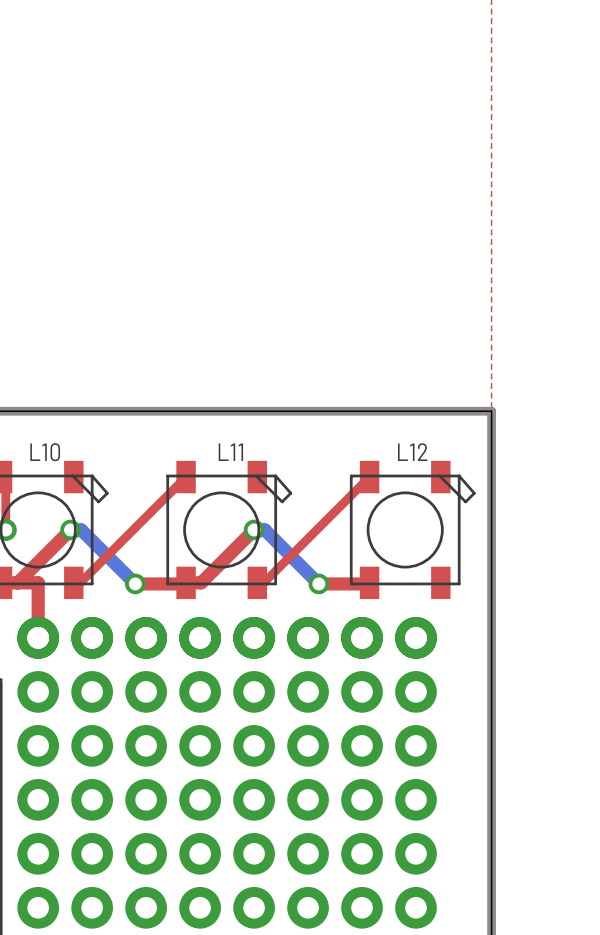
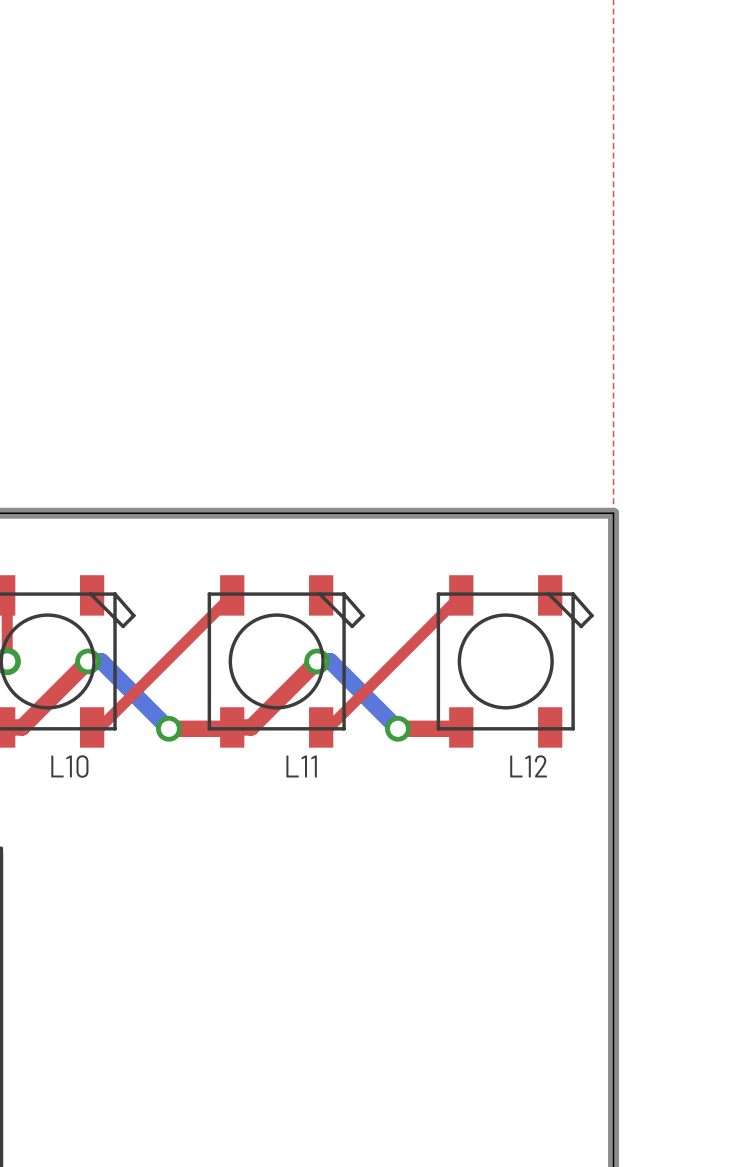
L10 name position: L10 (45, 452) -> L10 (69, 766)
L11 name position: L11 (230, 452) -> L11 (301, 766)
L12 name position: L12 (412, 452) -> L12 (528, 766)
top track: (17, 582) (38, 582) (38, 637) -> none
via: (38, 637) -> none
via: (92, 637) -> none
via: (146, 637) -> none
via: (200, 637) -> none
via: (254, 637) -> none
via: (308, 637) -> none
via: (362, 637) -> none
via: (416, 637) -> none
via: (38, 691) -> none
via: (92, 691) -> none
via: (146, 691) -> none
via: (200, 691) -> none
via: (254, 691) -> none
via: (308, 691) -> none
via: (362, 691) -> none
via: (416, 691) -> none
via: (38, 745) -> none
via: (92, 745) -> none
via: (146, 745) -> none
via: (200, 745) -> none
via: (254, 745) -> none
via: (308, 745) -> none
via: (362, 745) -> none
via: (416, 745) -> none
via: (38, 799) -> none
via: (92, 799) -> none
via: (146, 799) -> none
via: (200, 799) -> none
via: (254, 799) -> none
via: (308, 799) -> none
via: (362, 799) -> none
via: (416, 799) -> none
via: (38, 853) -> none
via: (92, 853) -> none
via: (146, 853) -> none
via: (200, 853) -> none
via: (254, 853) -> none
via: (308, 853) -> none
via: (362, 853) -> none
via: (416, 853) -> none
via: (38, 907) -> none
via: (92, 907) -> none
via: (146, 907) -> none
via: (200, 907) -> none
via: (254, 907) -> none
via: (308, 907) -> none
via: (362, 907) -> none
via: (416, 907) -> none

